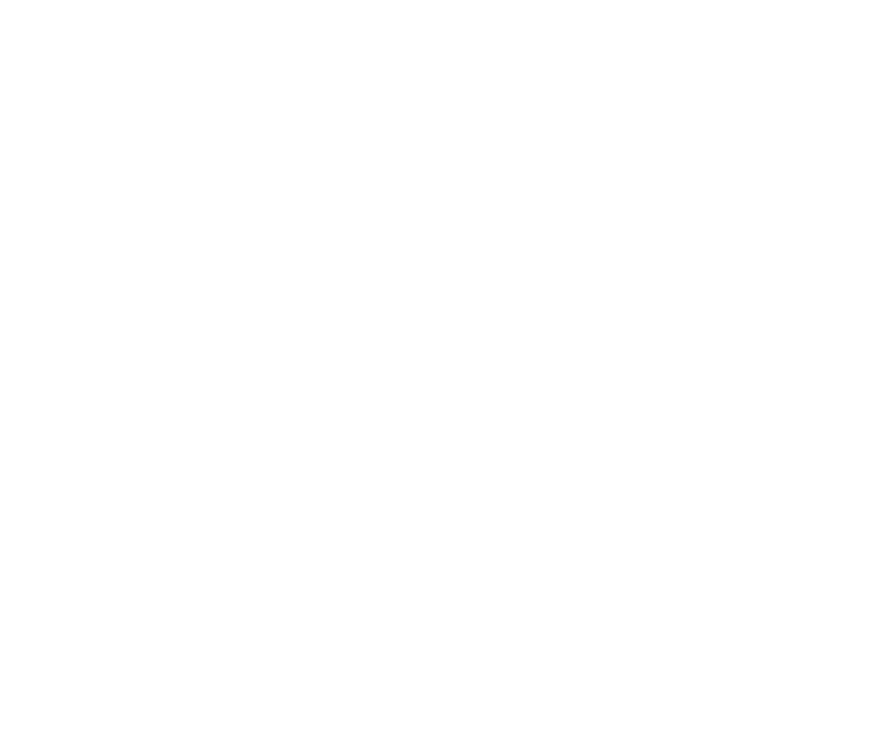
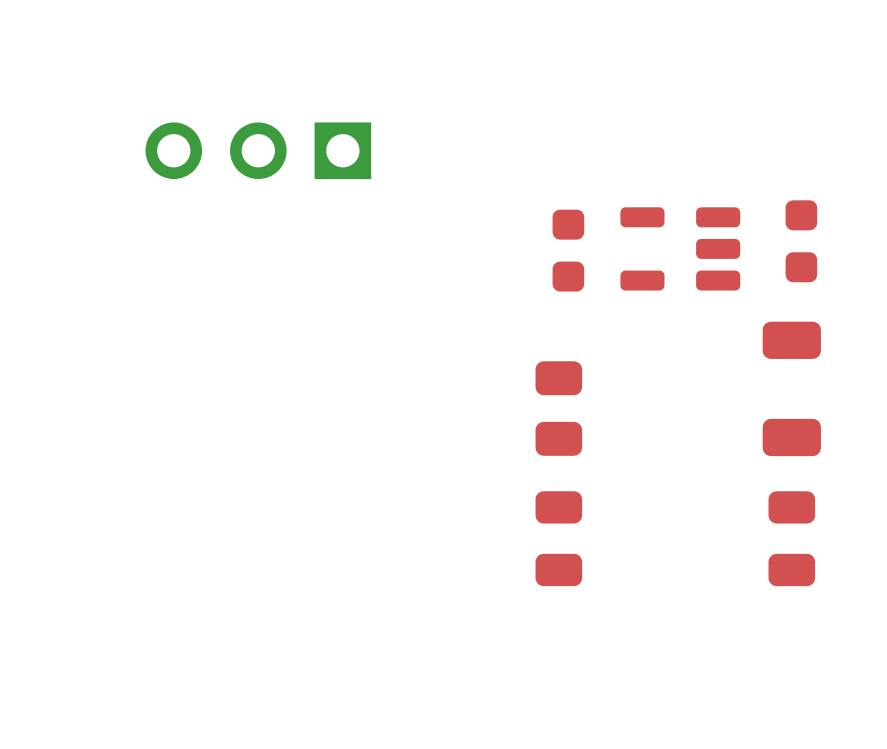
part: none -> (258, 150)
part: none -> (801, 241)
part: none -> (680, 248)
part: none -> (568, 250)
part: none -> (791, 388)
part: none -> (558, 408)
part: none -> (558, 538)
part: none -> (791, 538)

